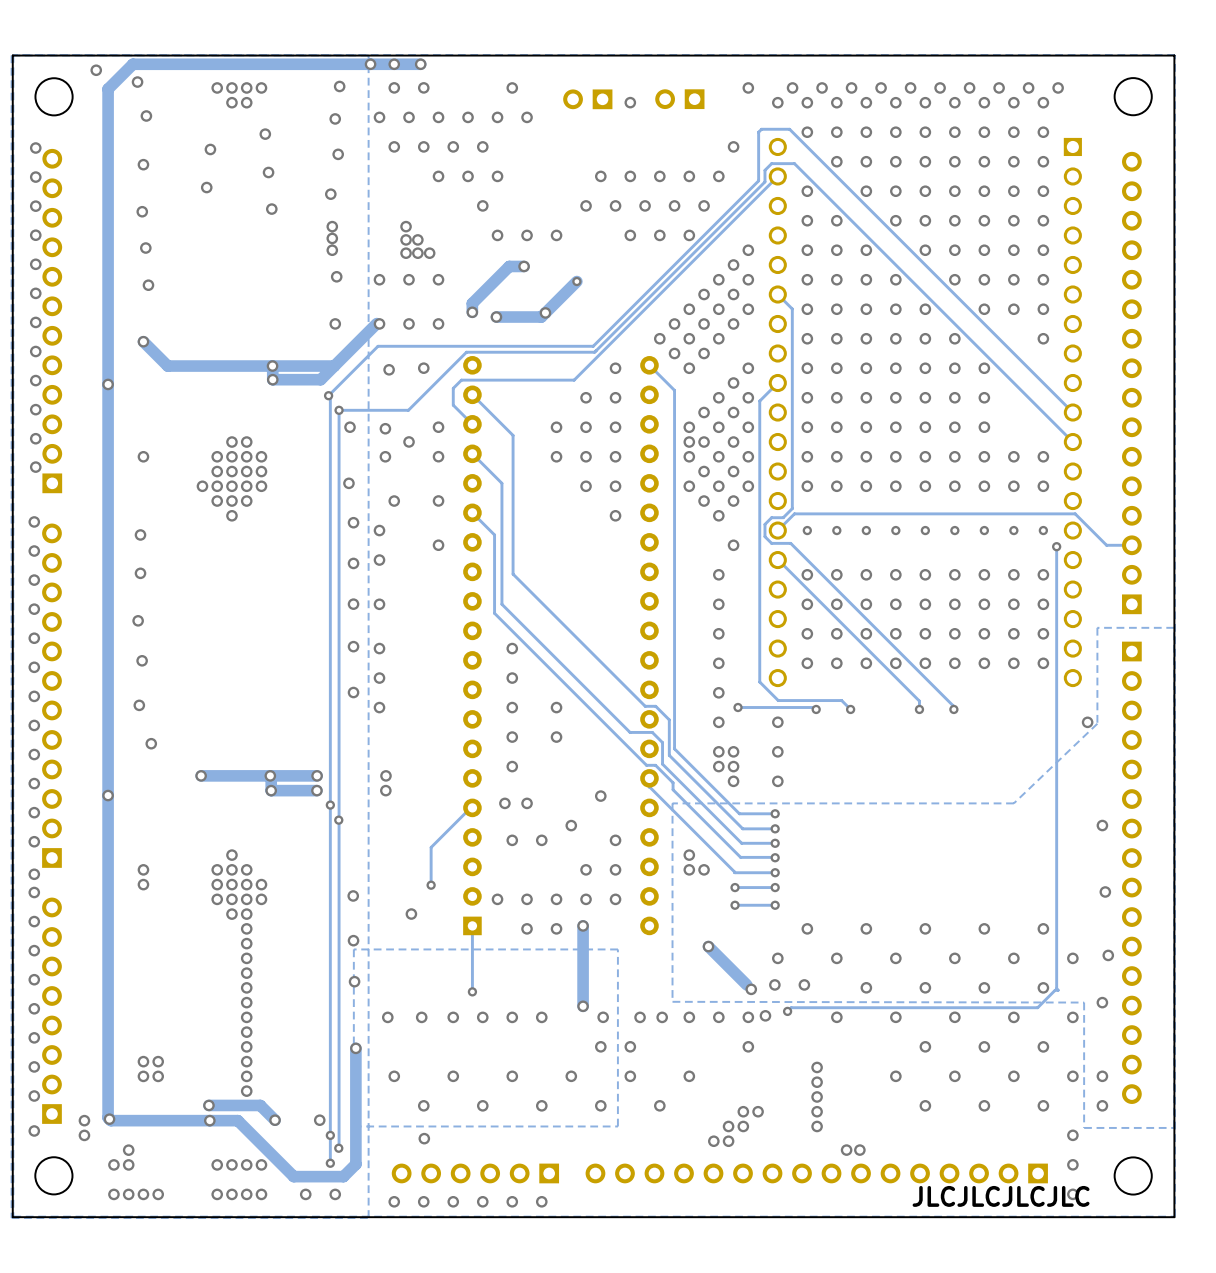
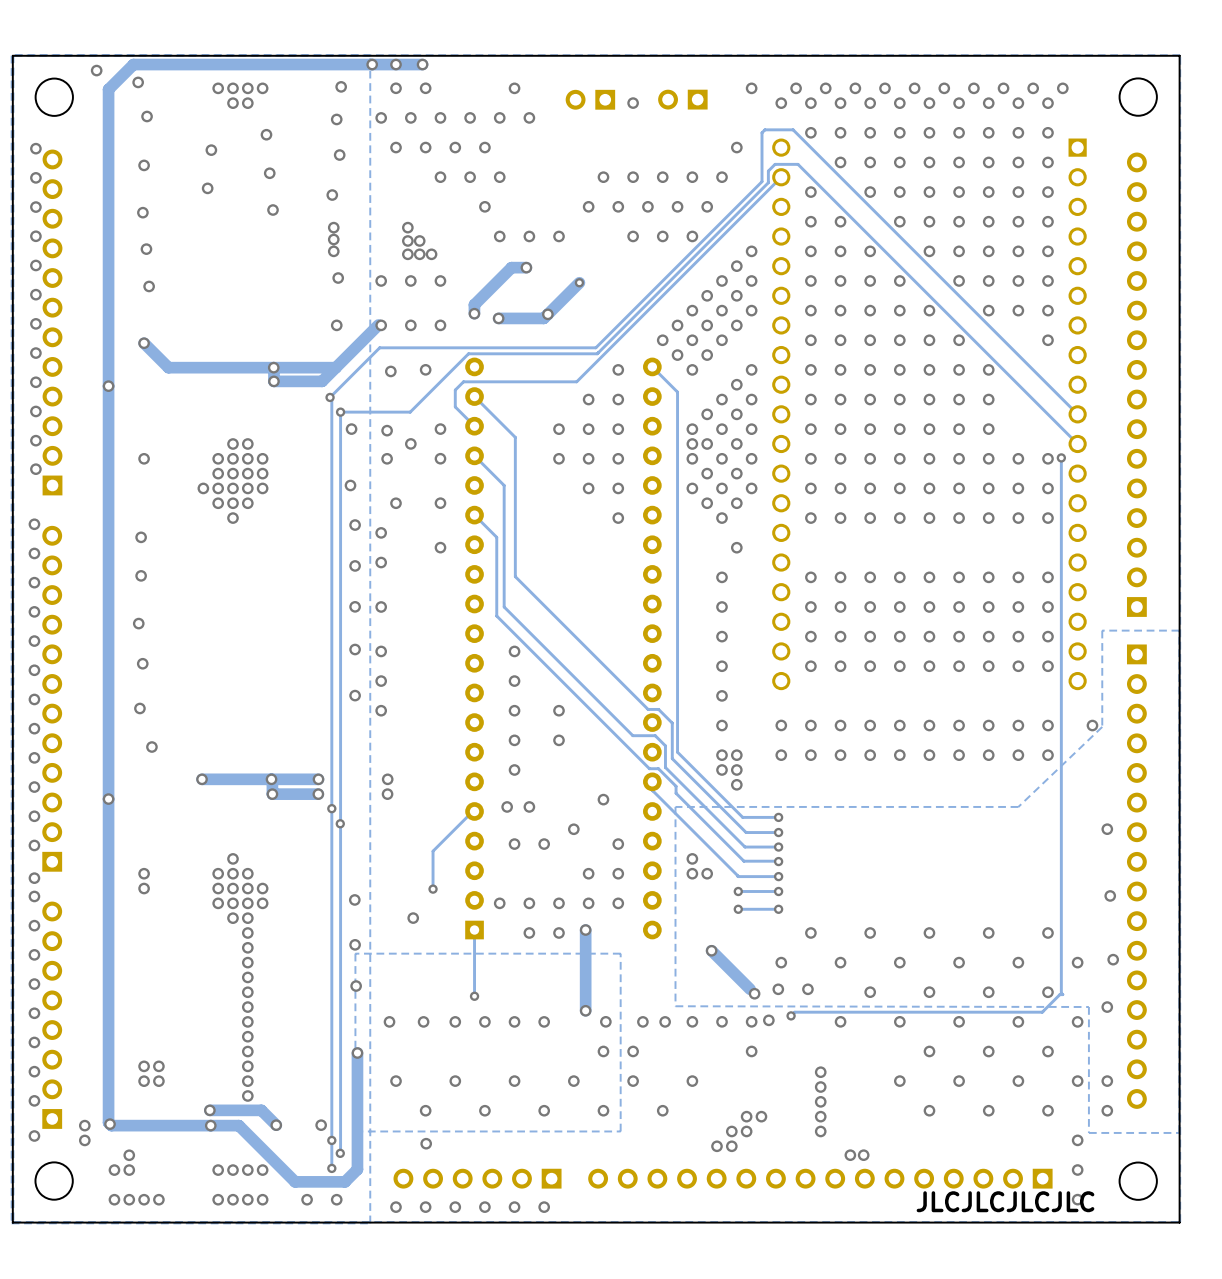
track: (777, 294) (792, 309) (792, 508) (783, 517) (771, 517) (764, 524) (764, 536) (771, 543) (790, 543) (953, 706) (953, 708) -> none
track: (777, 383) (759, 401) (759, 682) (778, 700) (841, 700) (850, 709) -> none
track: none -> (1061, 457) (1061, 549)
via: none -> (1061, 457)
via: none -> (810, 518)
via: none -> (840, 518)
via: none -> (870, 518)
via: none -> (899, 518)
via: none -> (929, 518)
via: none -> (959, 518)
via: none -> (988, 518)
via: none -> (1018, 518)
via: none -> (1047, 518)
track: (777, 530) (794, 513) (1075, 513) (1106, 545) (1131, 545) -> none
via: (807, 530) -> none
via: (836, 530) -> none
via: (866, 530) -> none
via: (895, 530) -> none
via: (925, 530) -> none
via: (954, 530) -> none
via: (984, 530) -> none
via: (1013, 530) -> none
via: (1043, 530) -> none
via: (1056, 546) -> none
track: (777, 560) (919, 701) (919, 709) -> none
track: (738, 707) (816, 708) -> none
via: (738, 707) -> none
via: (816, 709) -> none
via: (850, 709) -> none
via: (919, 709) -> none
via: (953, 709) -> none
via: none -> (810, 725)
via: none -> (840, 725)
via: none -> (870, 725)
via: none -> (899, 725)
via: none -> (929, 725)
via: none -> (959, 725)
via: none -> (988, 725)
via: none -> (1018, 725)
via: none -> (1047, 725)
via: none -> (810, 755)
via: none -> (840, 755)
via: none -> (870, 755)
via: none -> (899, 755)
via: none -> (929, 755)
via: none -> (959, 755)
via: none -> (988, 755)
via: none -> (1018, 755)
via: none -> (1047, 755)
via: (777, 781) -> none

